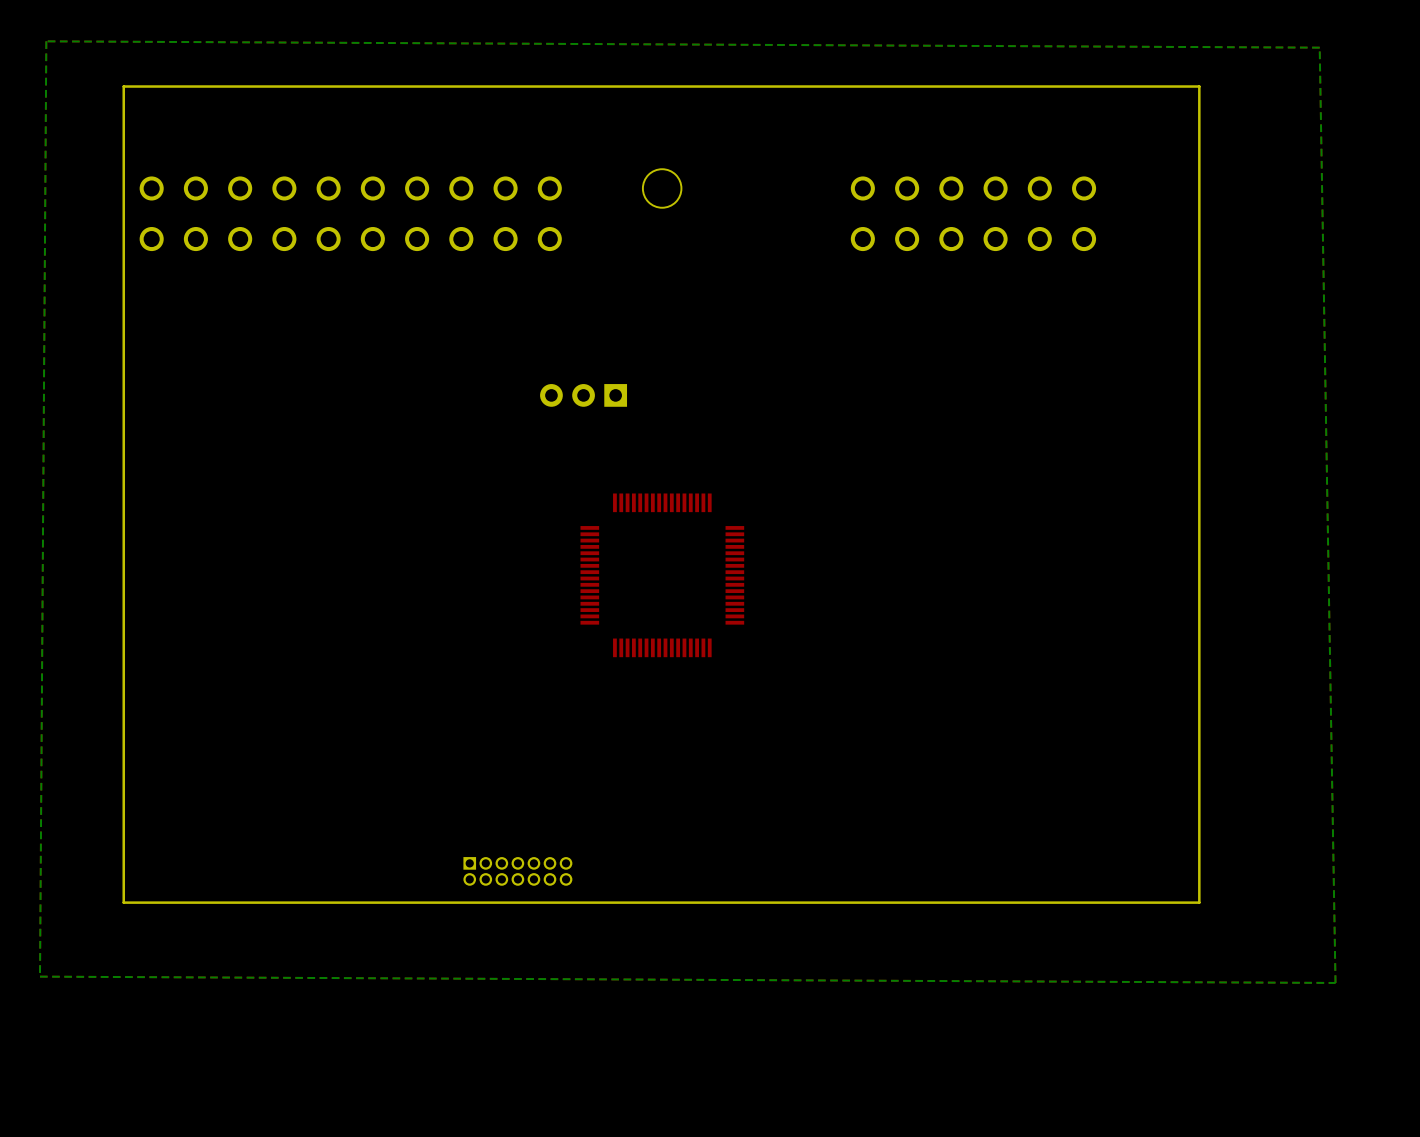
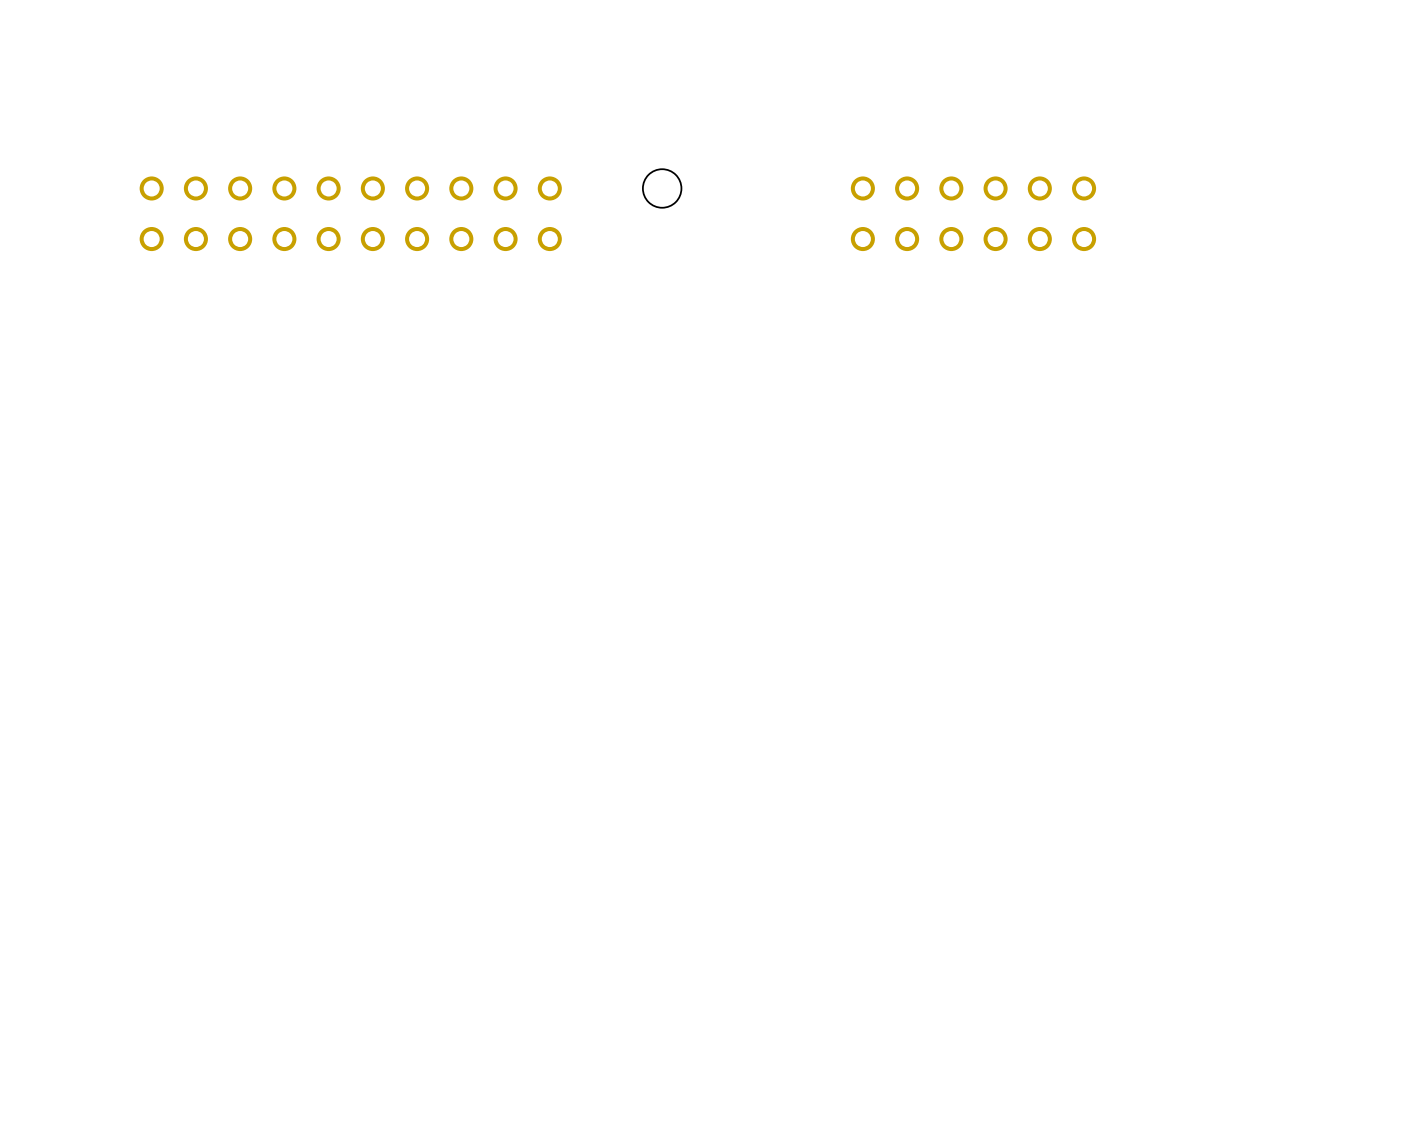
bottom zone outline: (46, 41) (1319, 47) (1335, 982) (40, 976) (46, 41) -> none
board edge: (1199, 86) (123, 86) (123, 902) (1199, 902) (1199, 86) -> none
part: (583, 395) -> none
part: (662, 575) -> none
part: (517, 871) -> none

